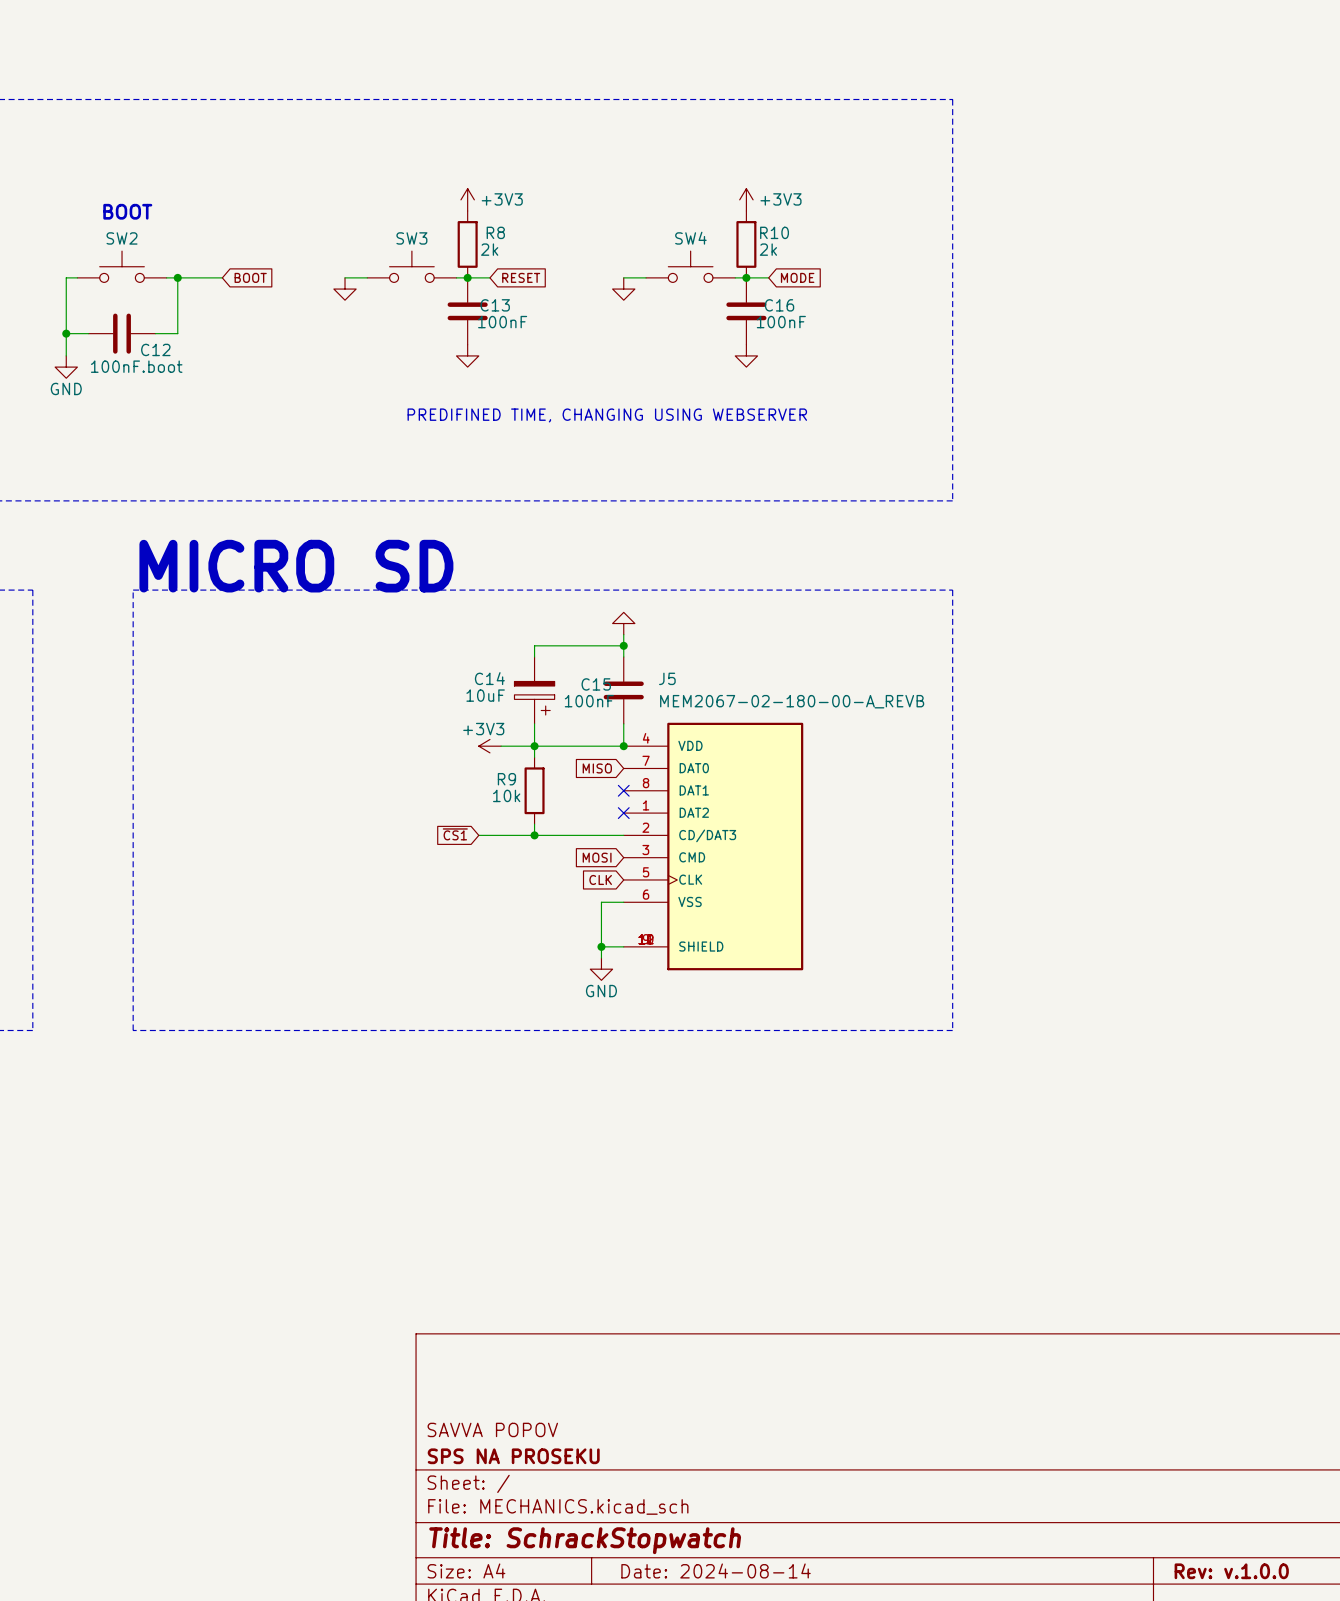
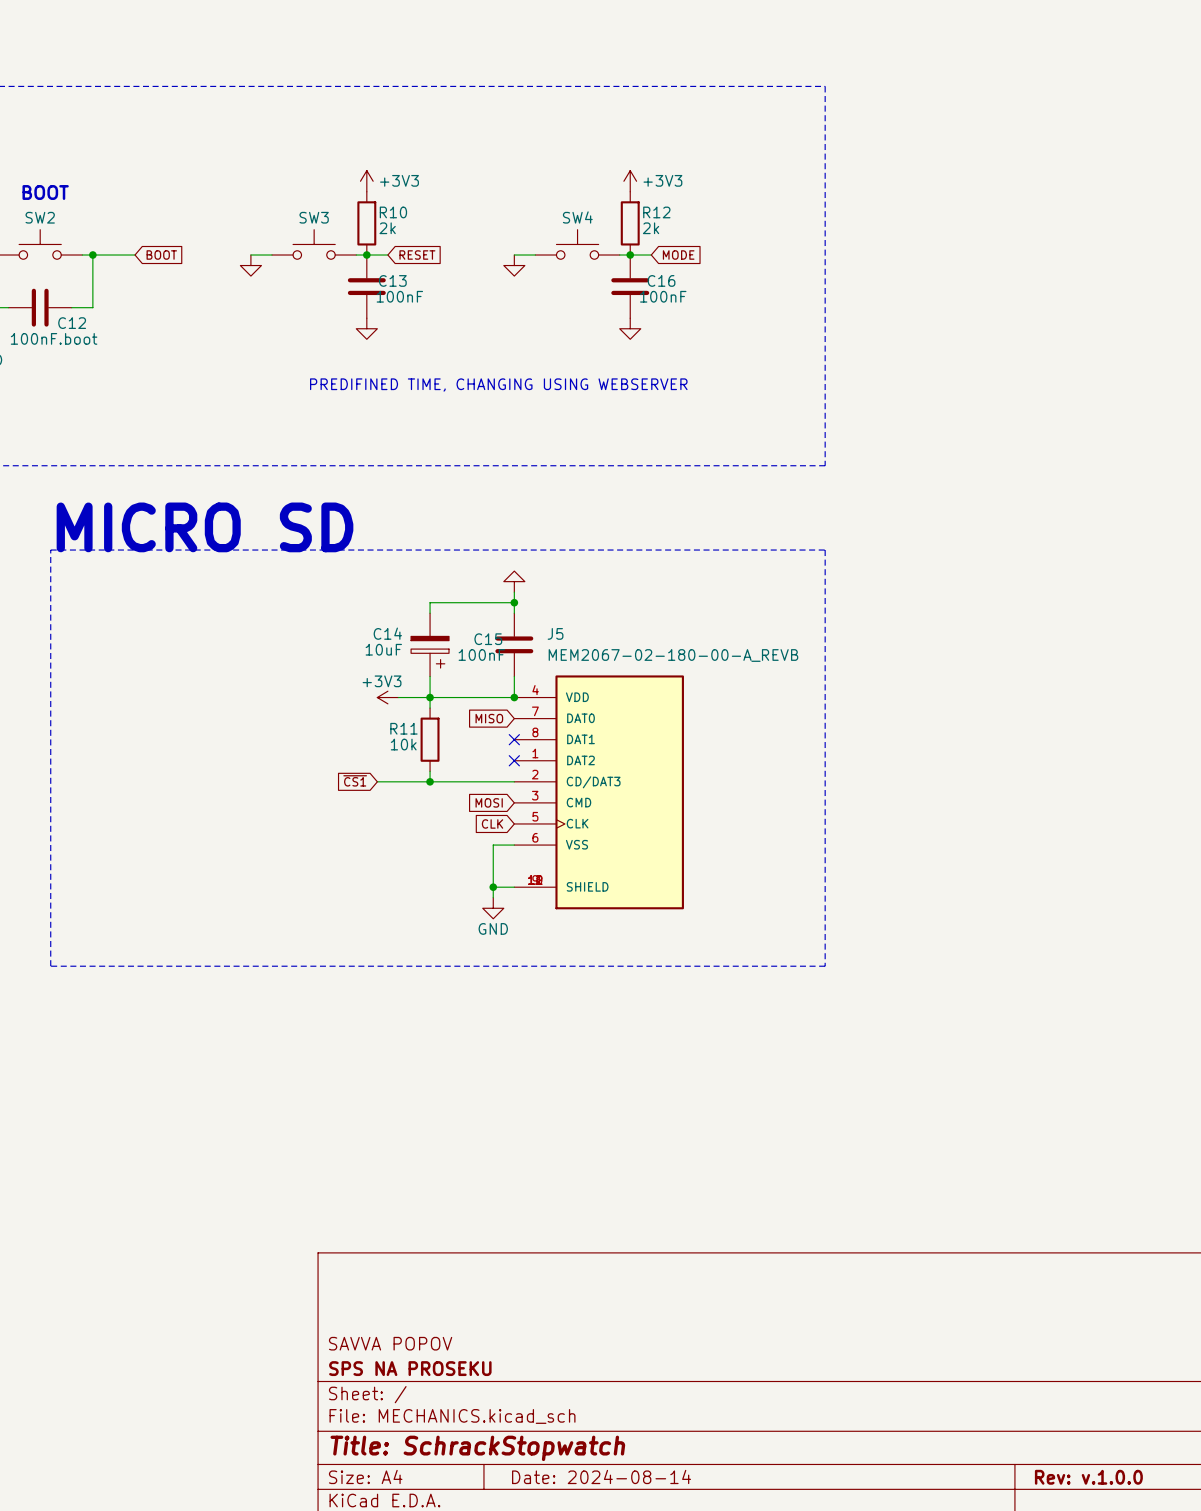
R8 name: R8 (495, 232) -> R10 (393, 212)
R10 name: R10 (774, 232) -> R12 (656, 212)
R9 name: R9 (506, 779) -> R11 (403, 728)

